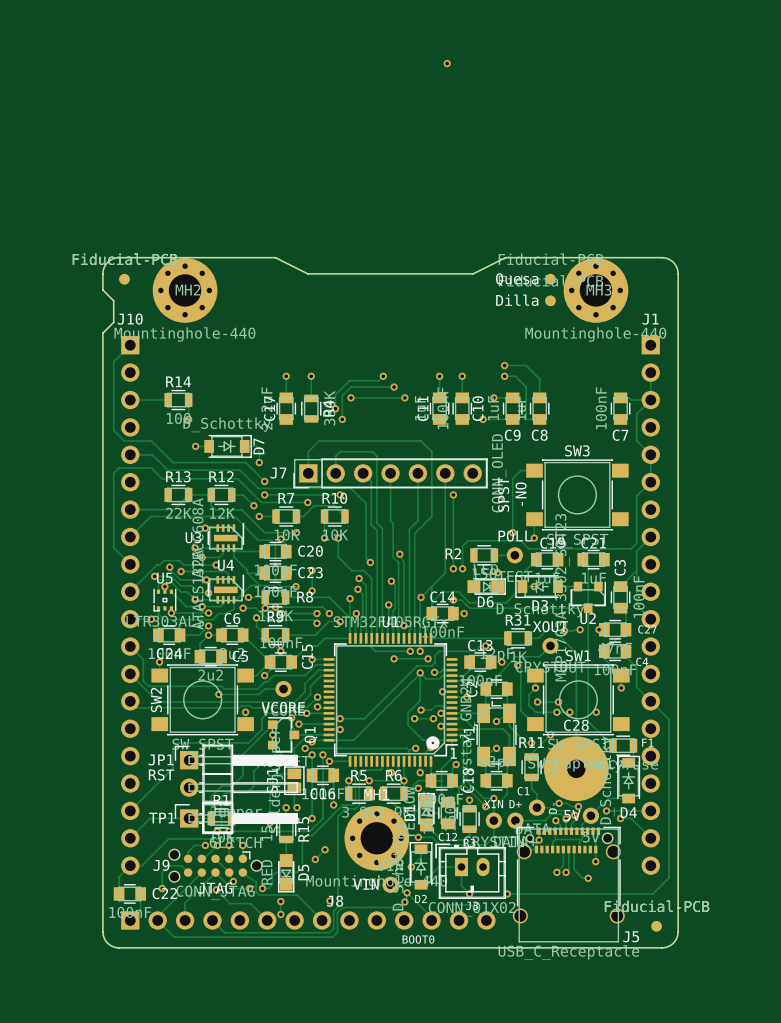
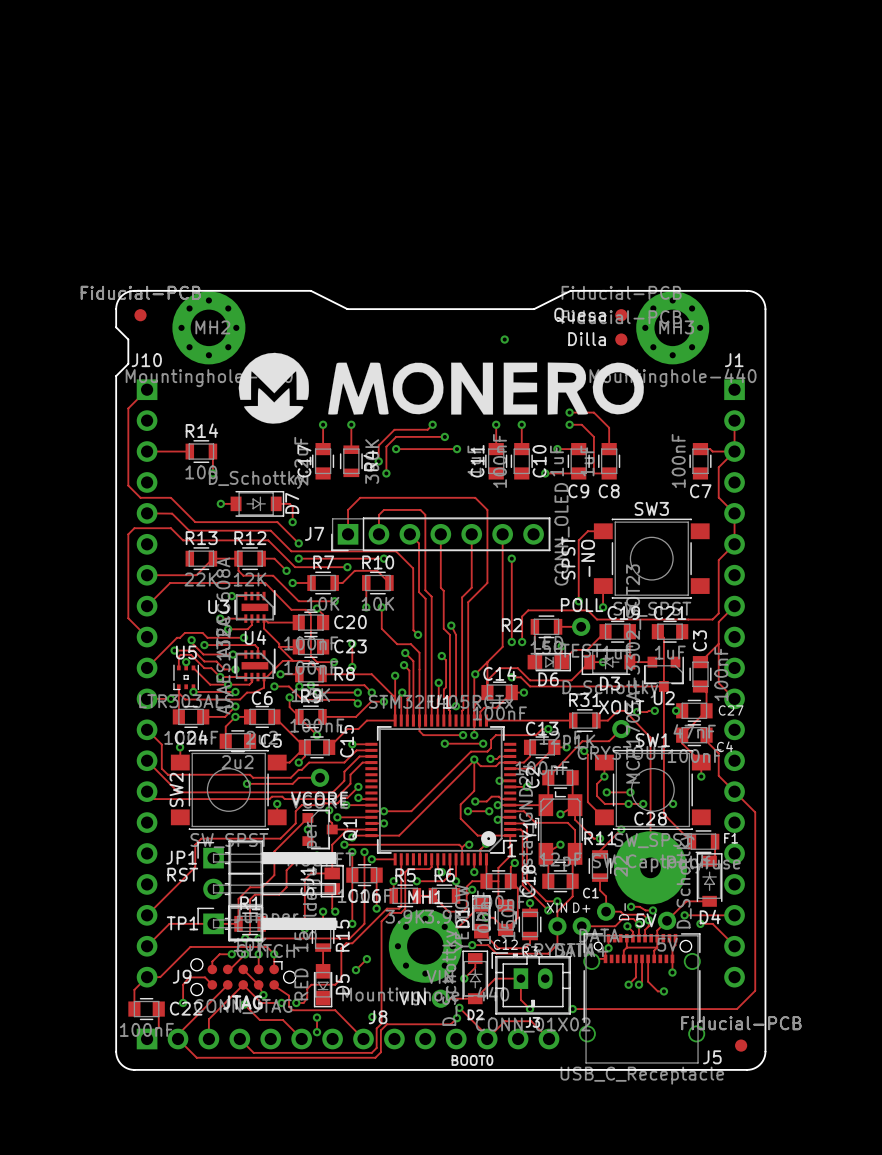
via: (447, 63) -> none
via: none -> (504, 339)
drawing: none -> [238, 352, 644, 424]

